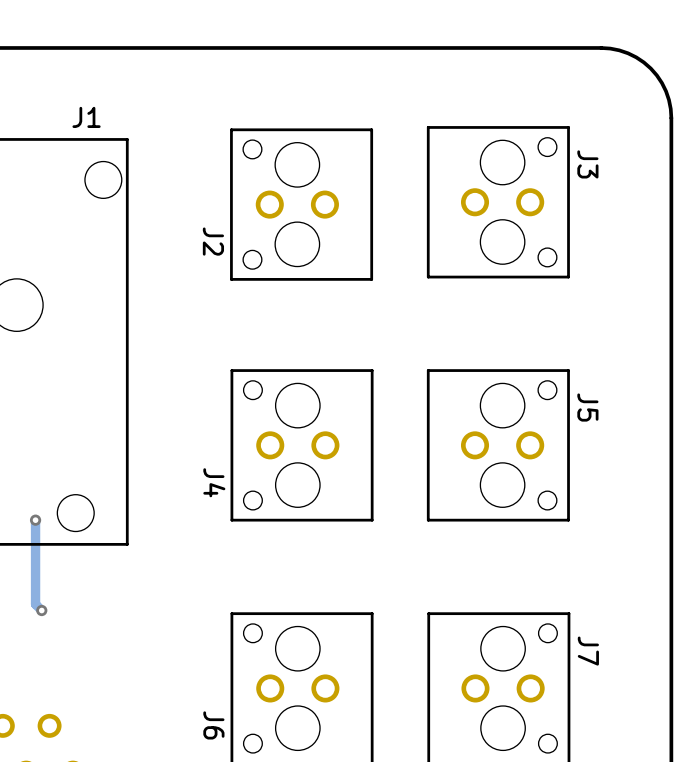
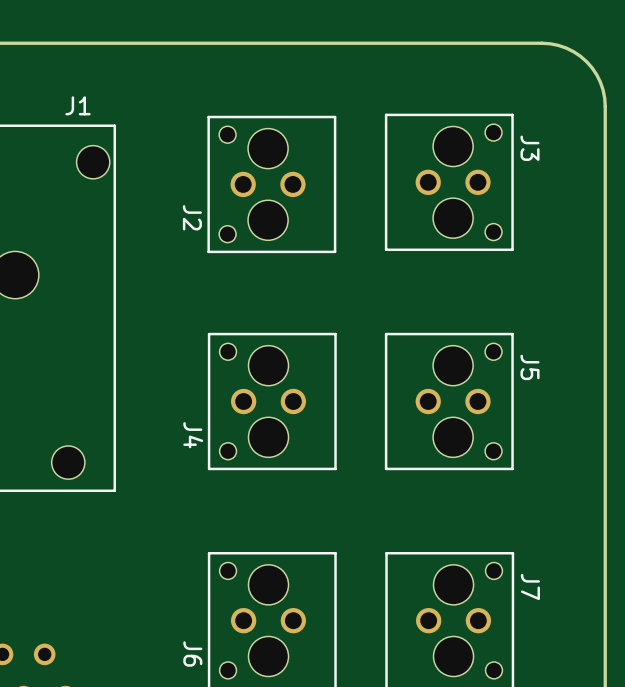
track: (35, 520) (35, 604) (41, 610) -> none
via: (35, 520) -> none
via: (41, 610) -> none

